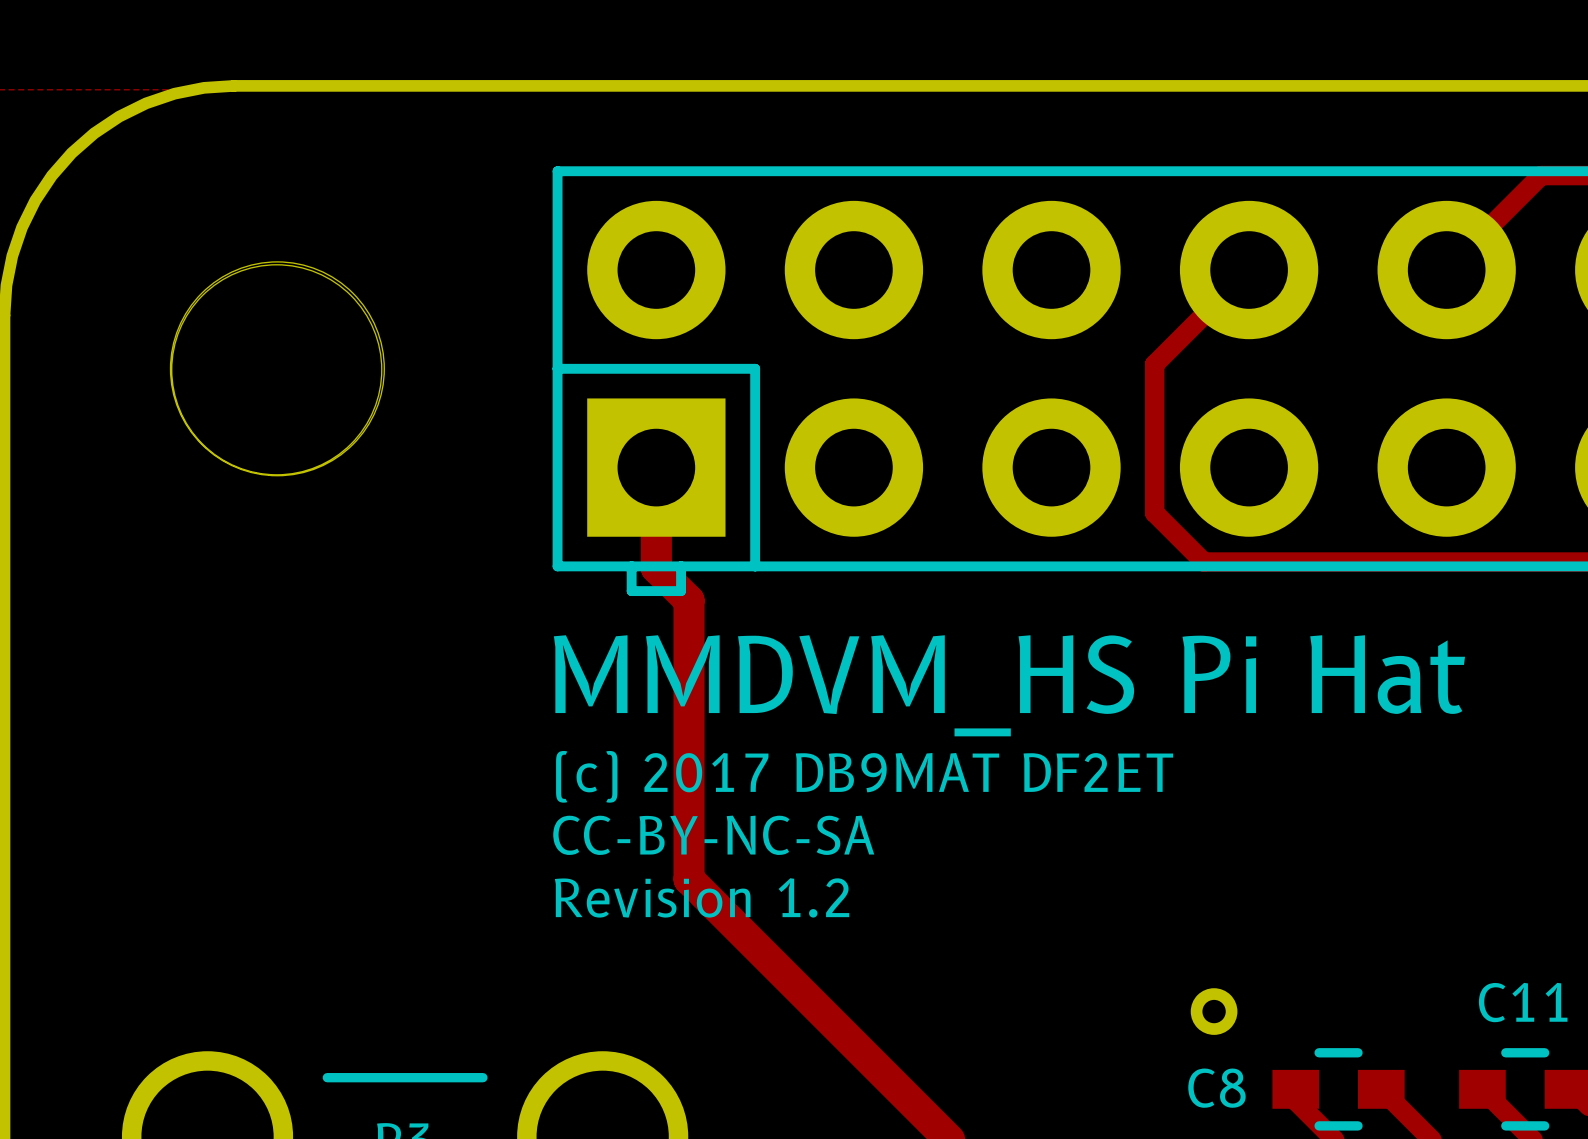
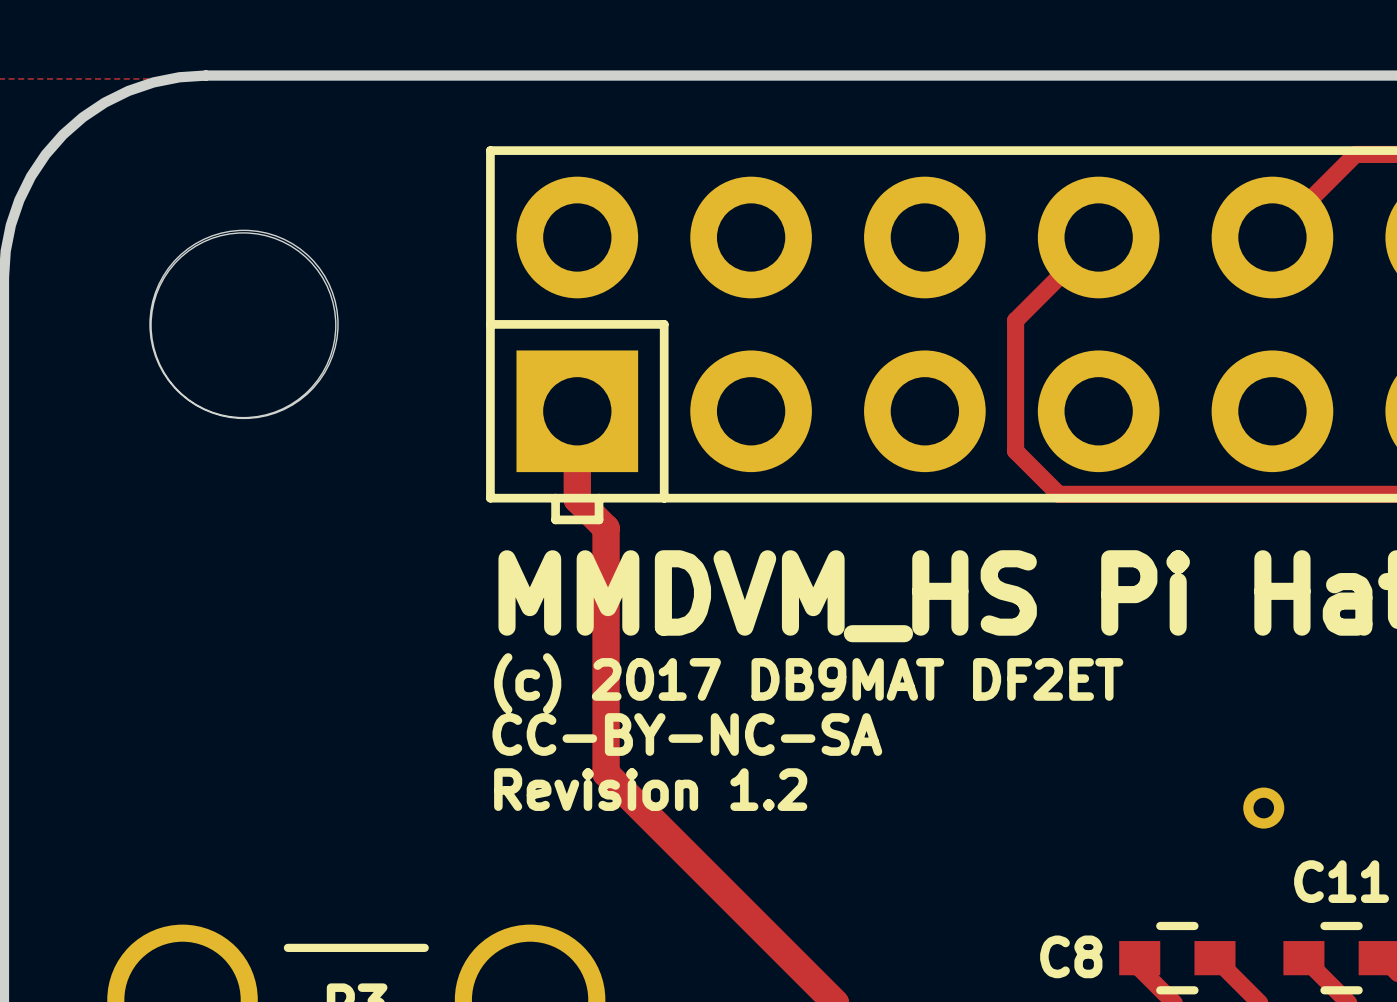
part: none -> (1263, 808)
part: (1214, 1011) -> none

